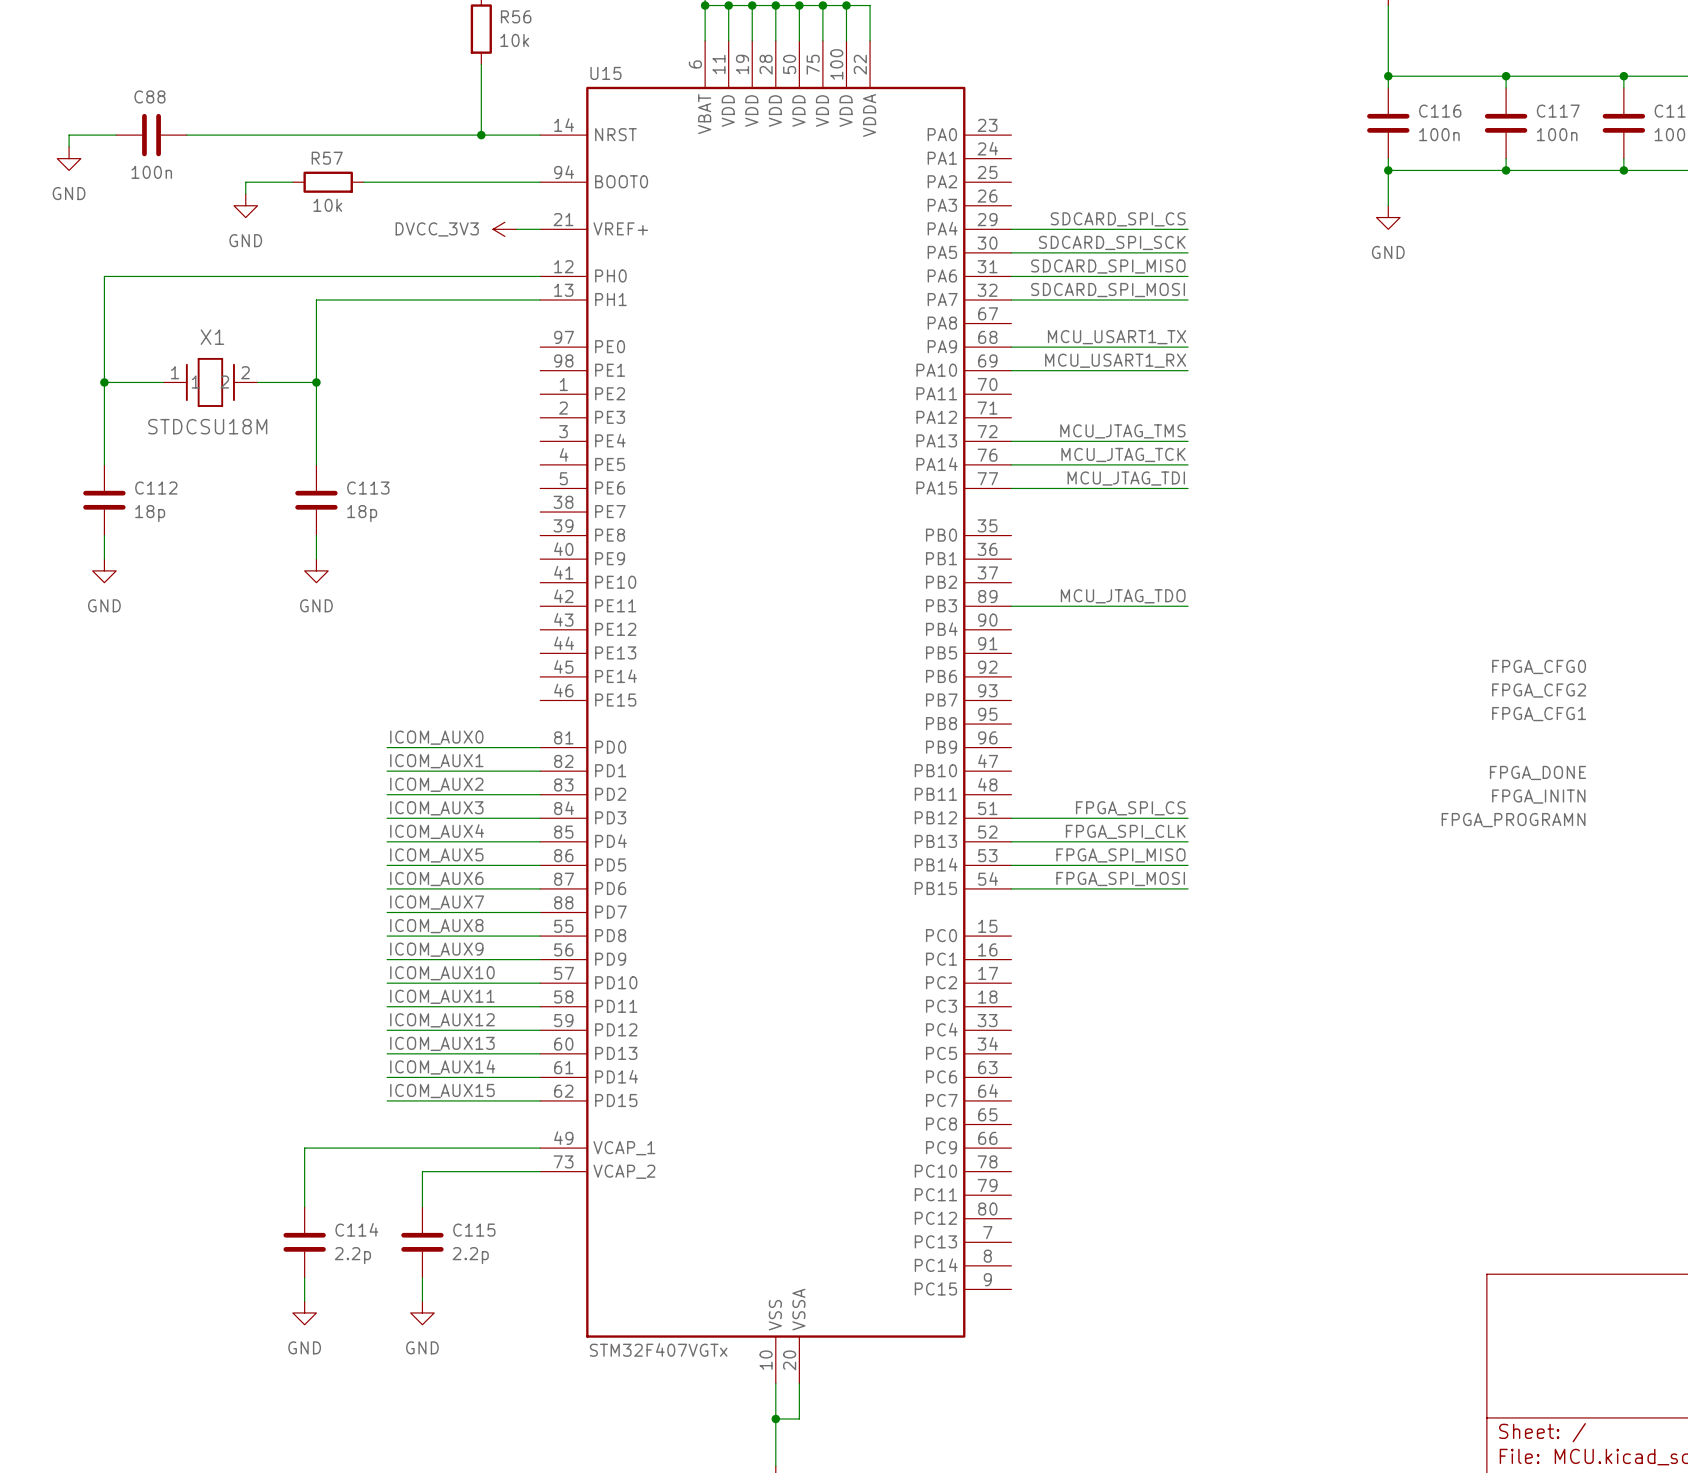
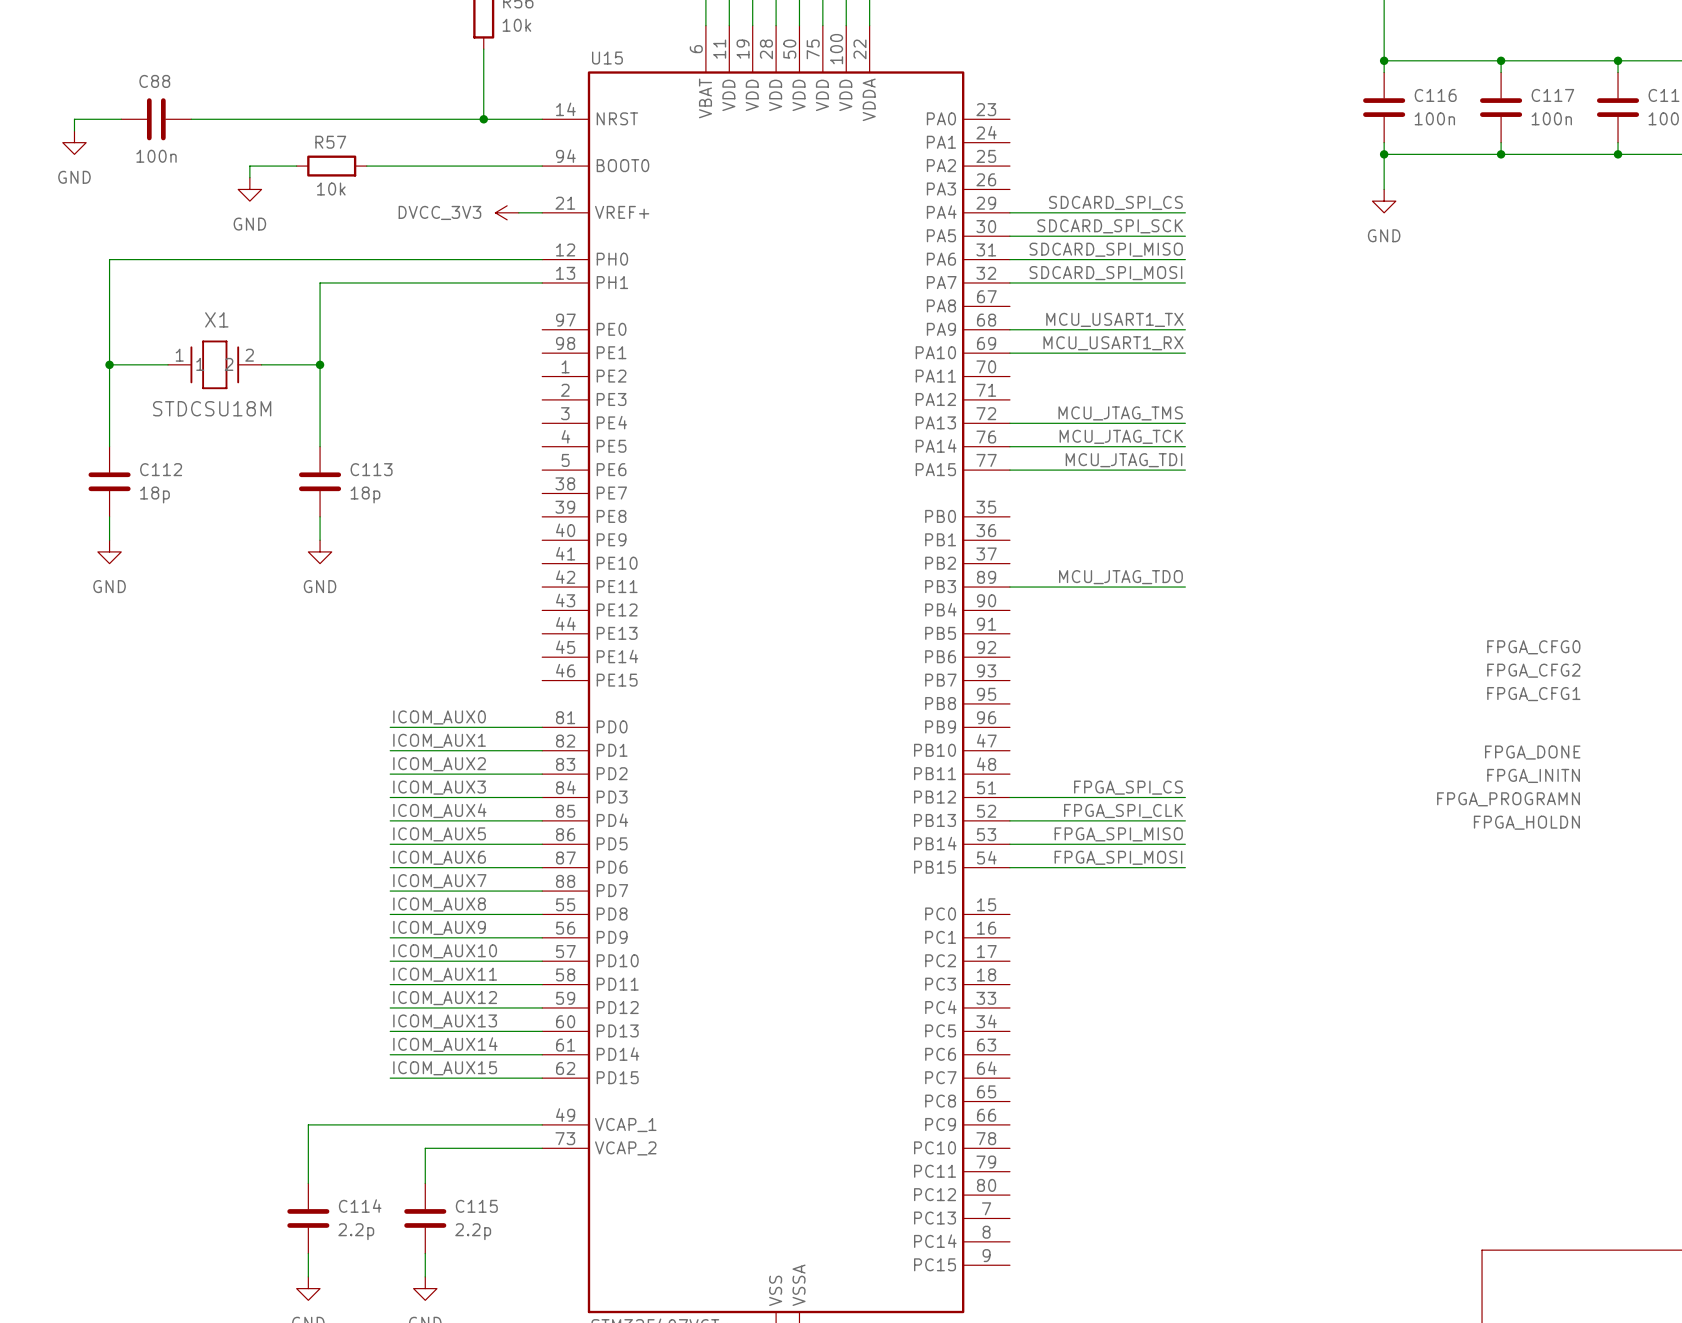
label: none -> FPGA_HOLDN (1526, 822)

